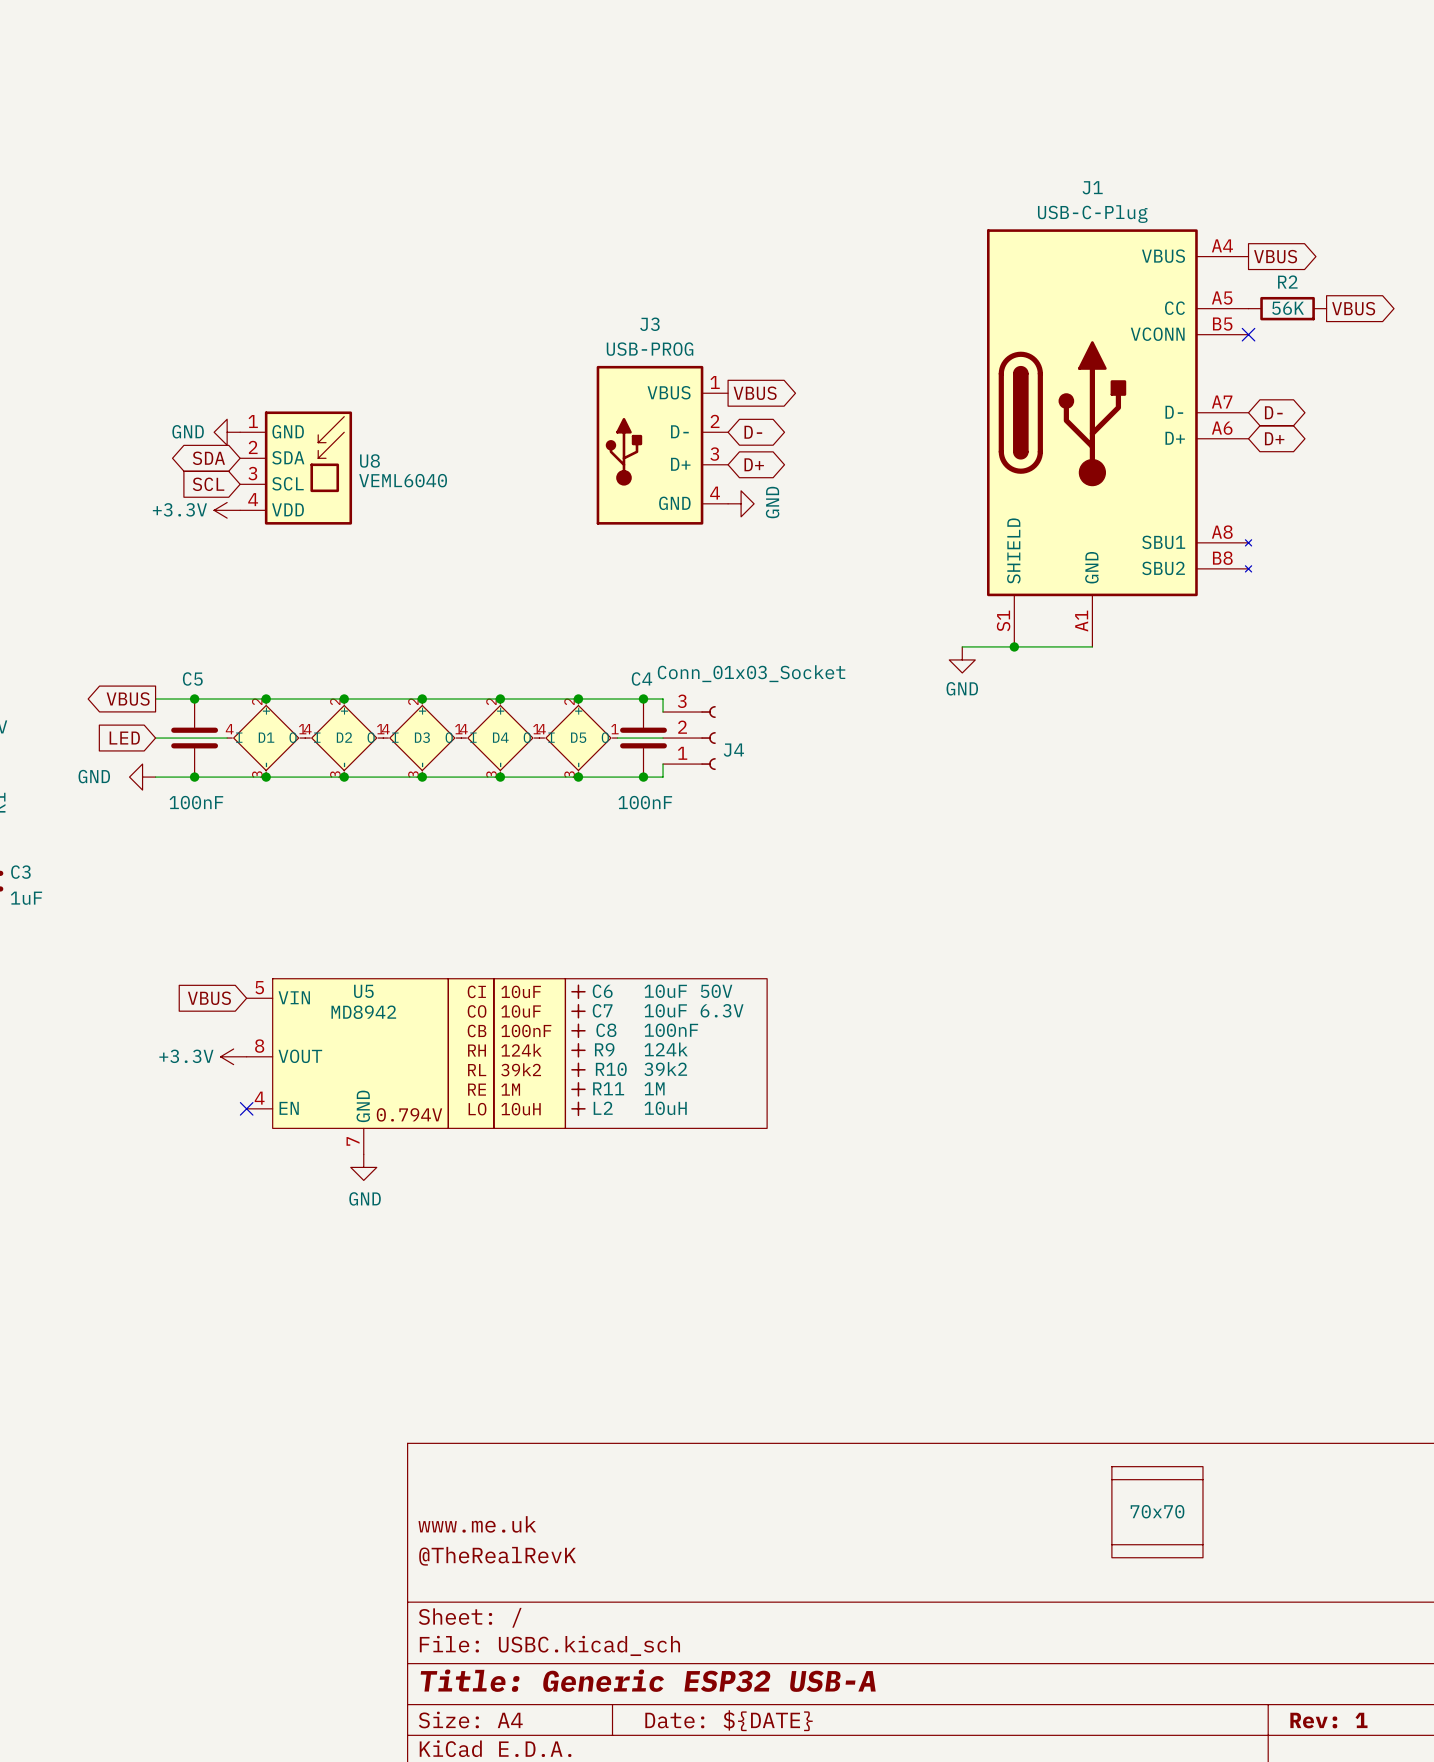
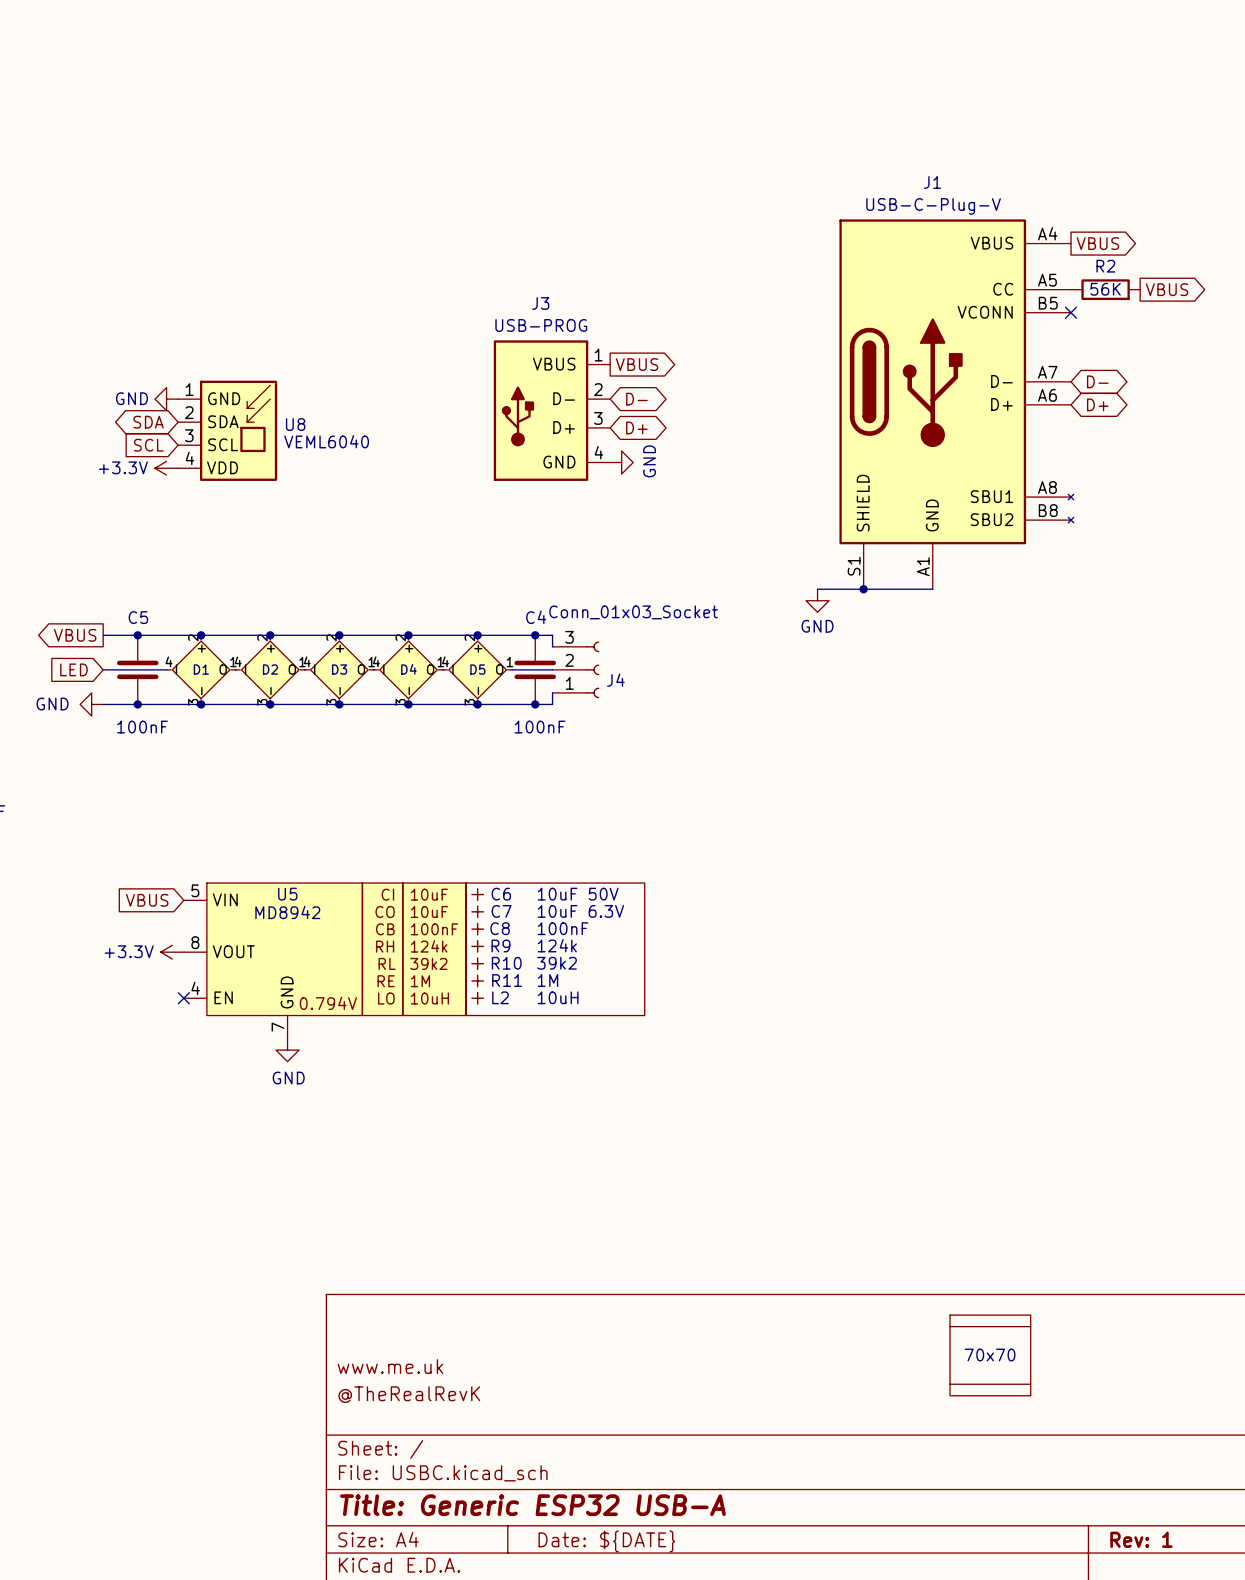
J1 value: USB-C-Plug (1092, 214) -> USB-C-Plug-V (933, 206)

